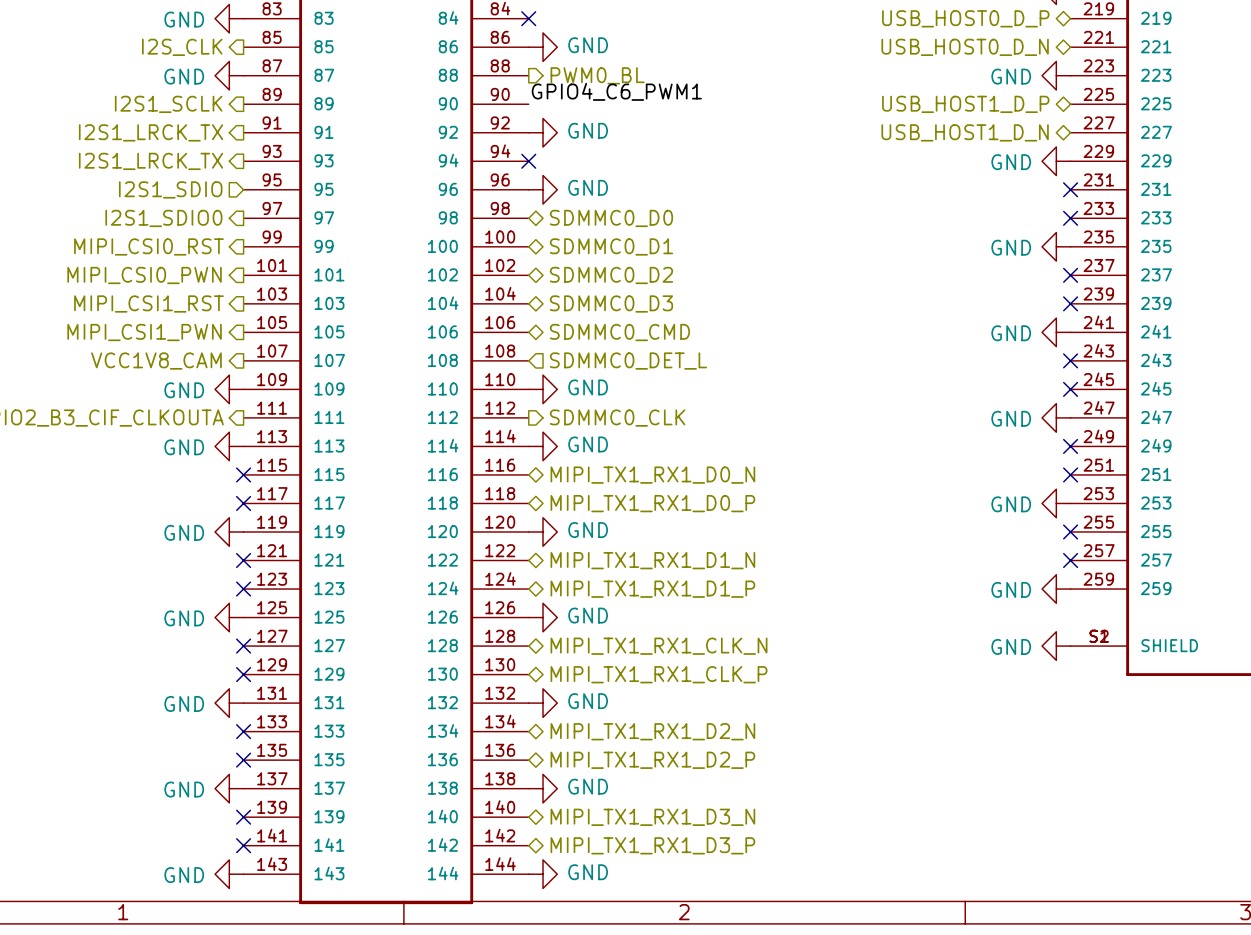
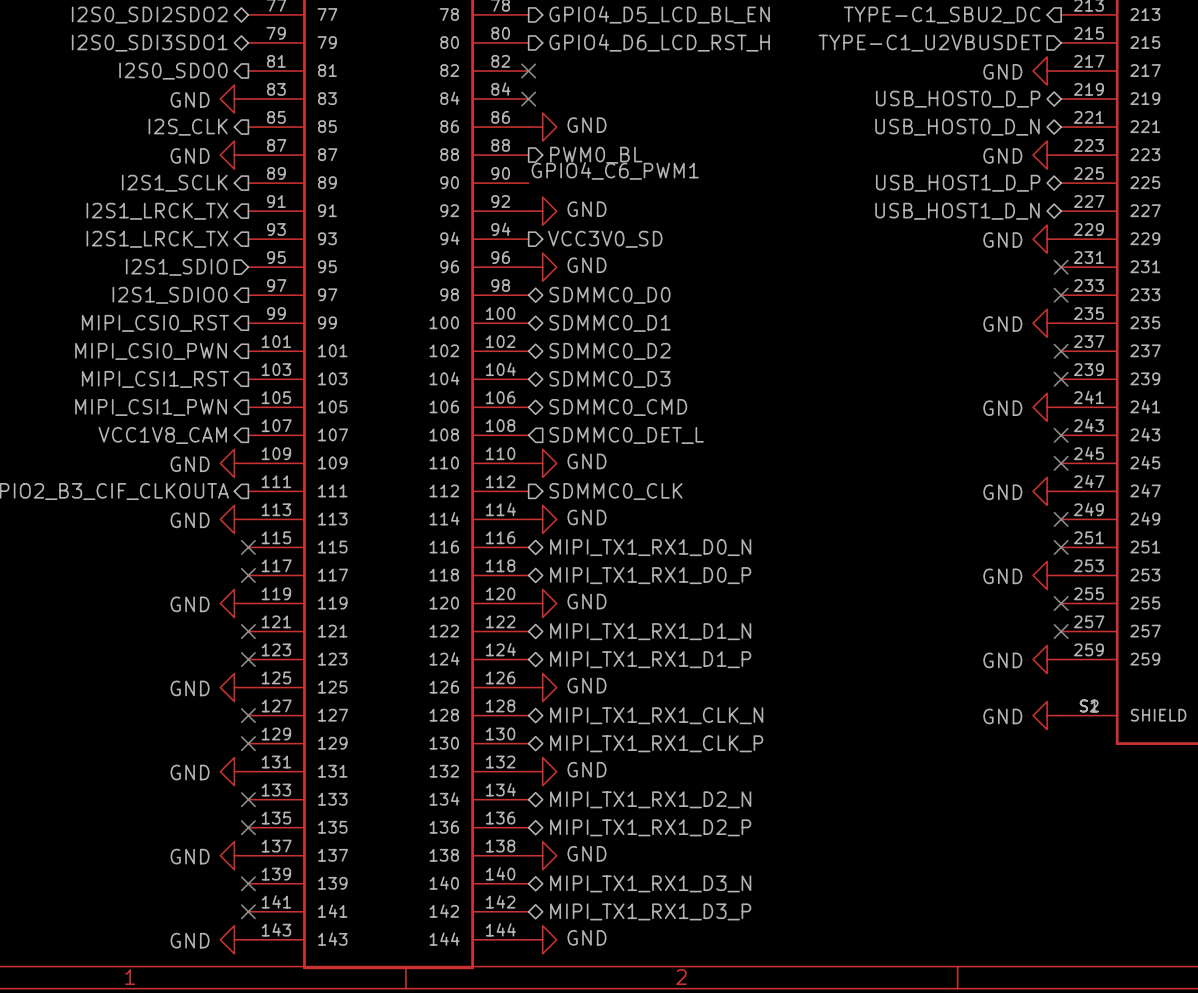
no-connect mark: (528, 161) -> none
hierarchical label: none -> VCC3V0_SD (605, 239)

